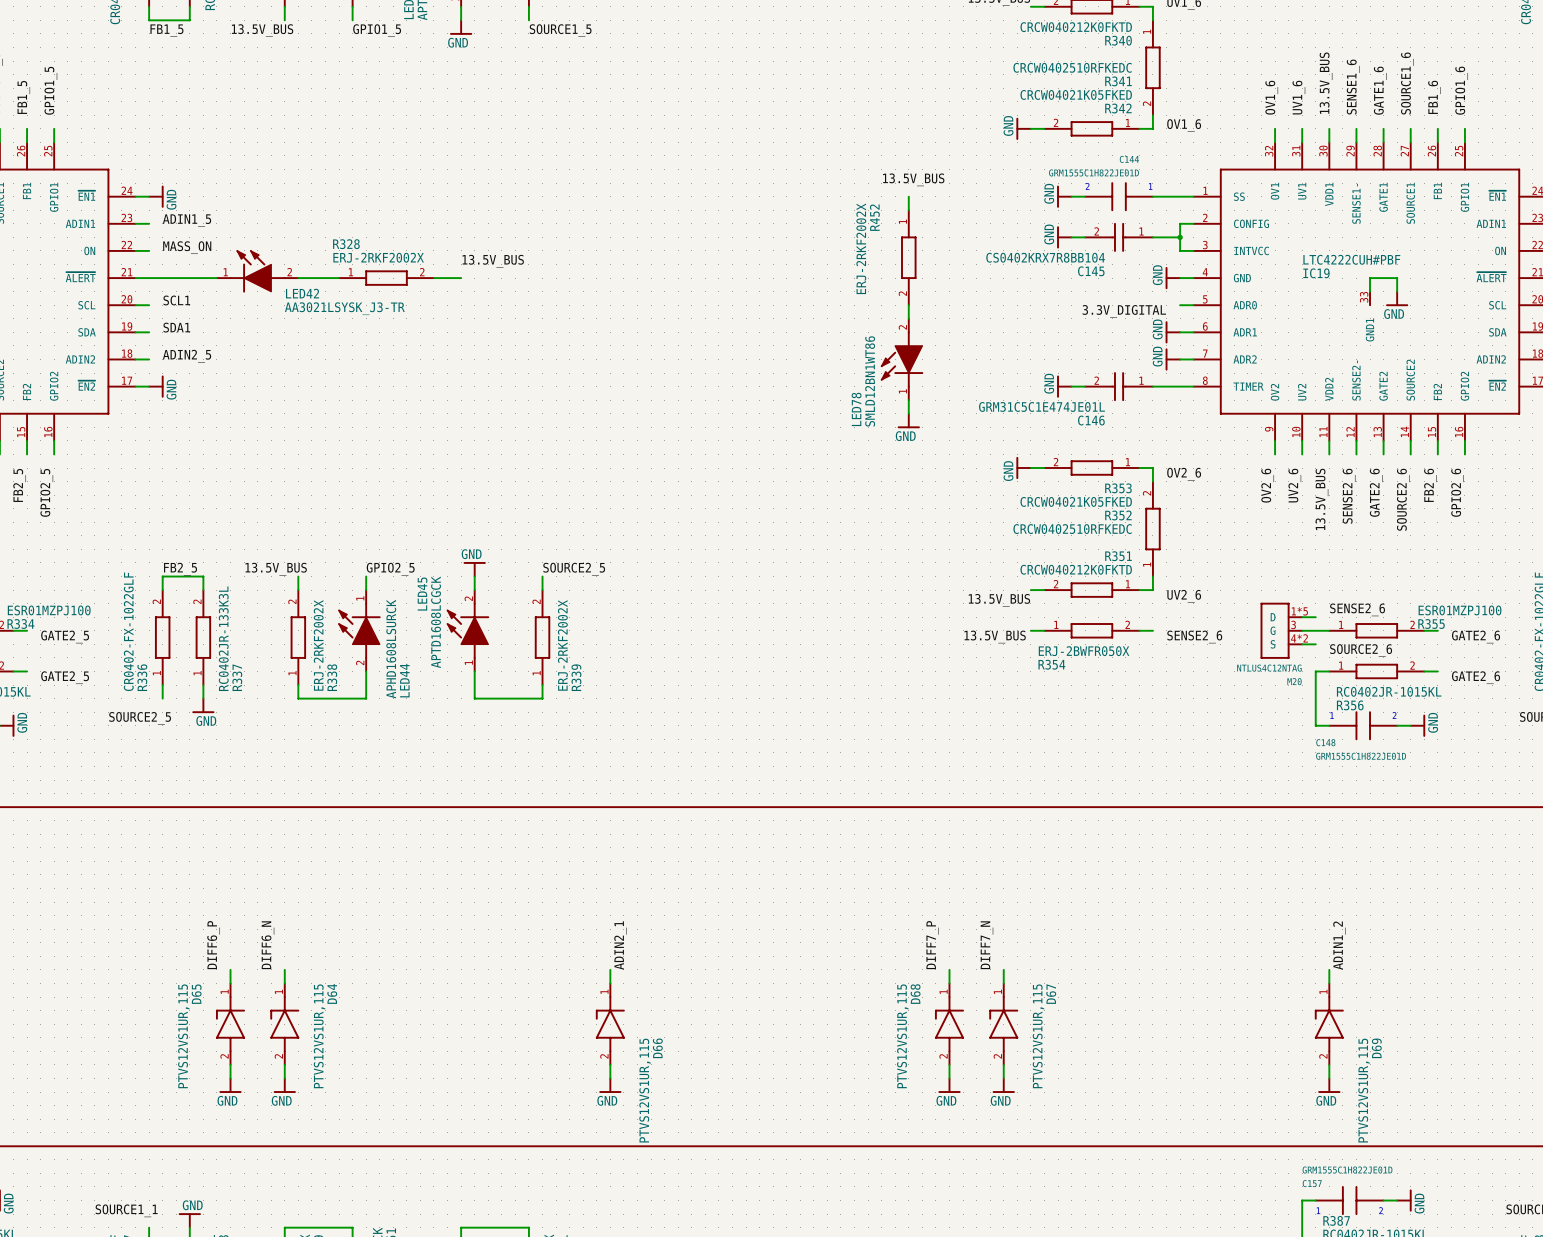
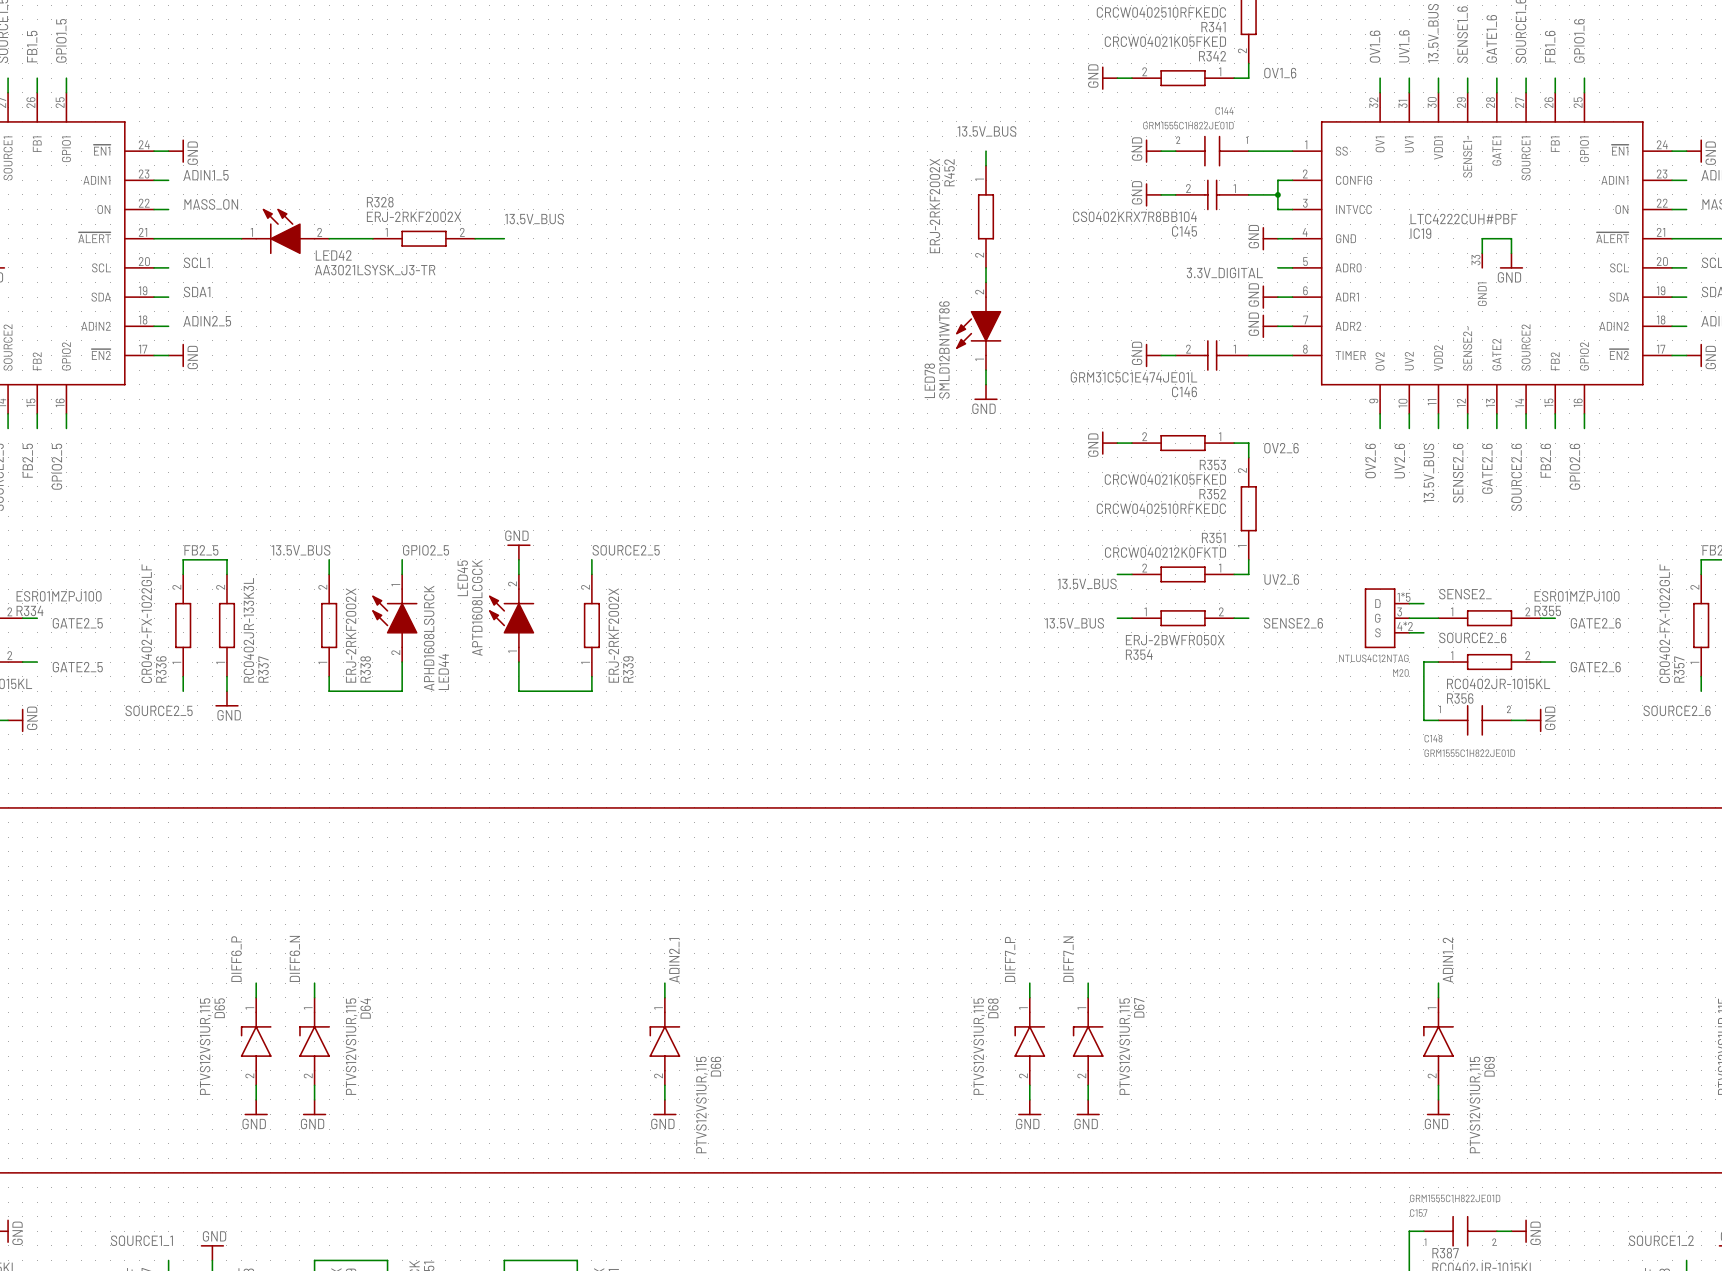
label: SENSE2_6 (1357, 609) -> SENSE2_ (1465, 594)

